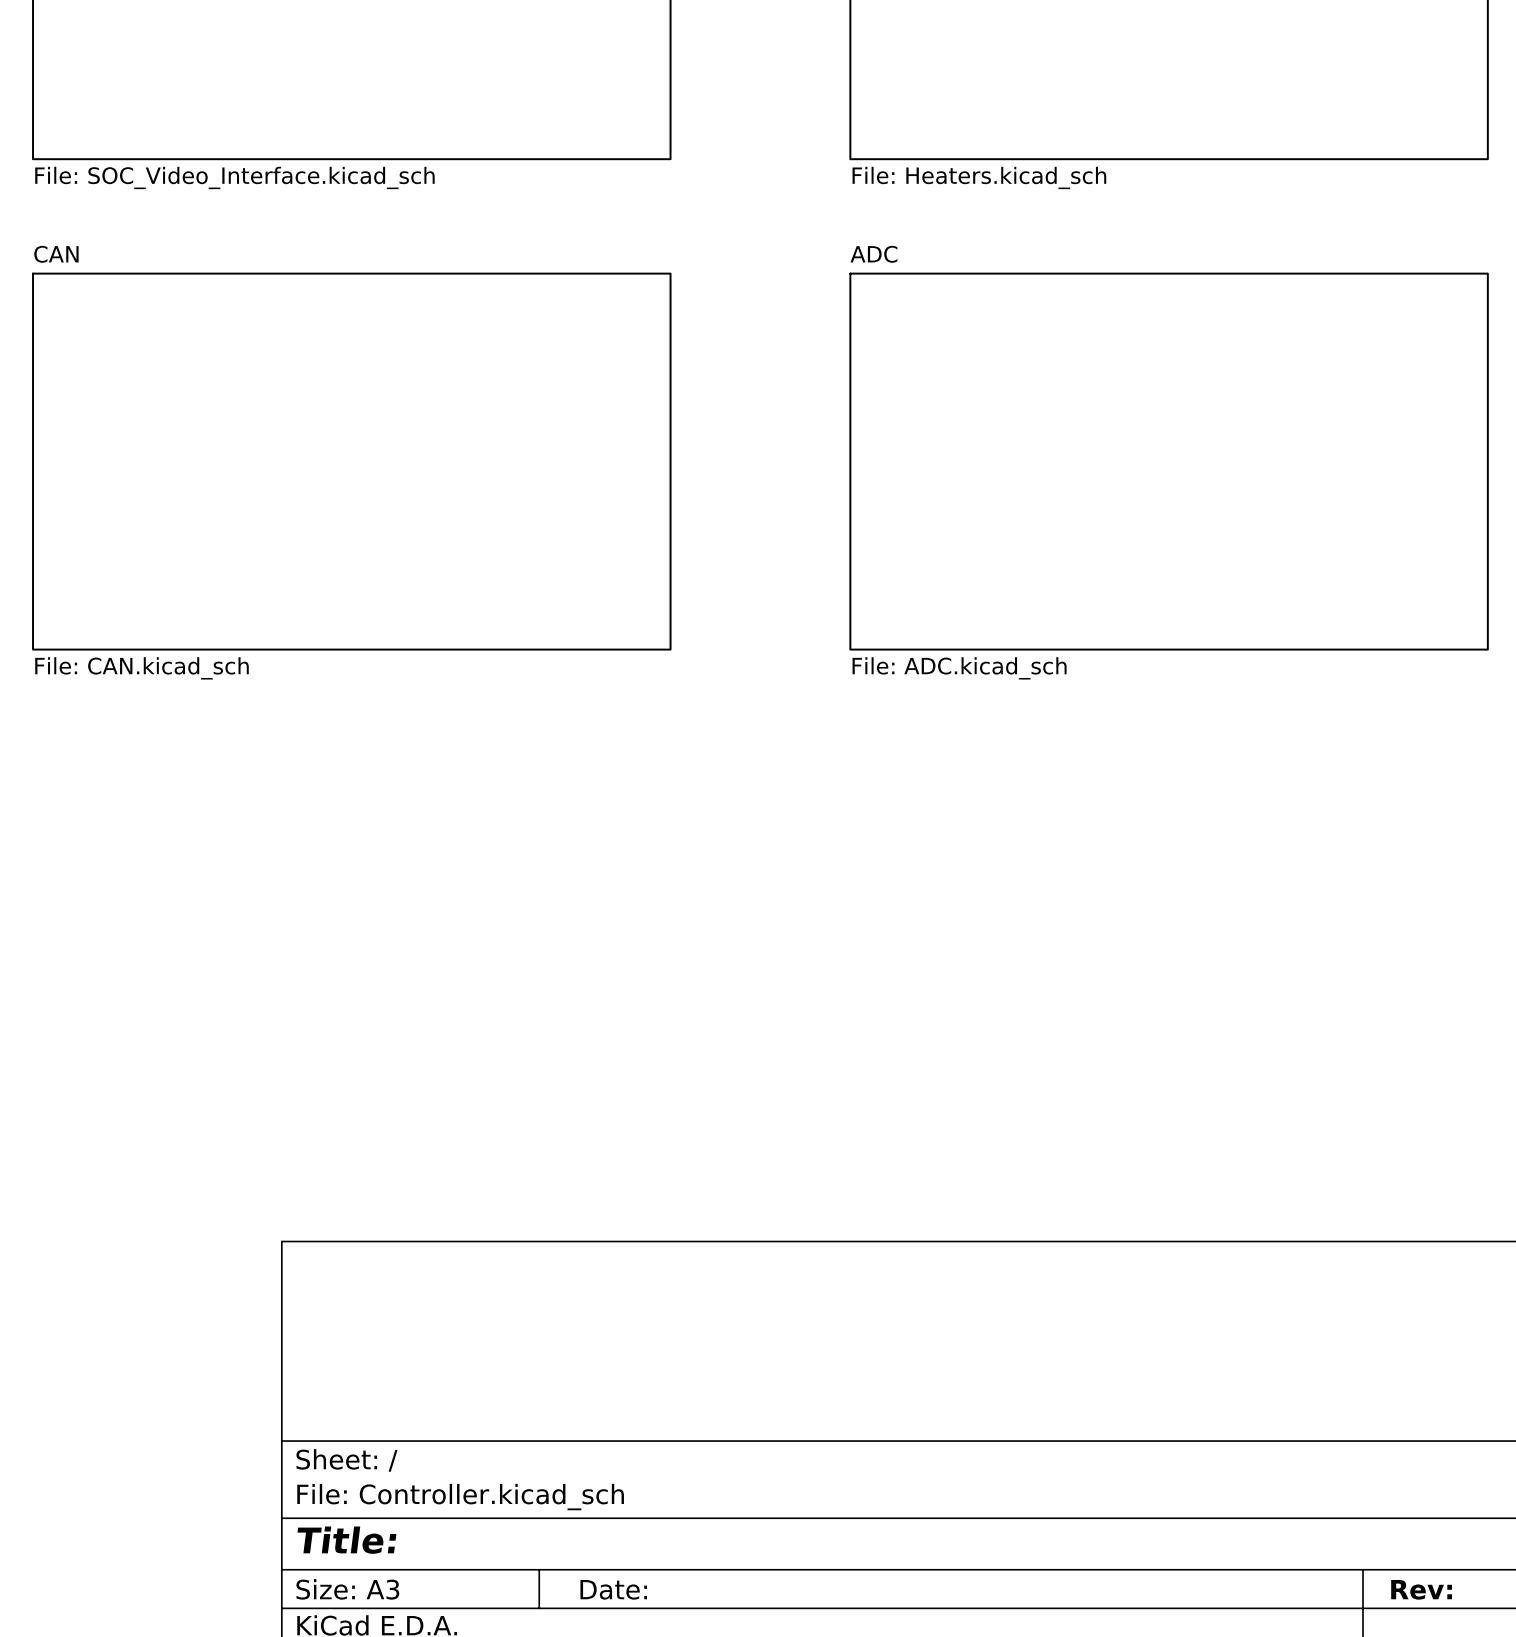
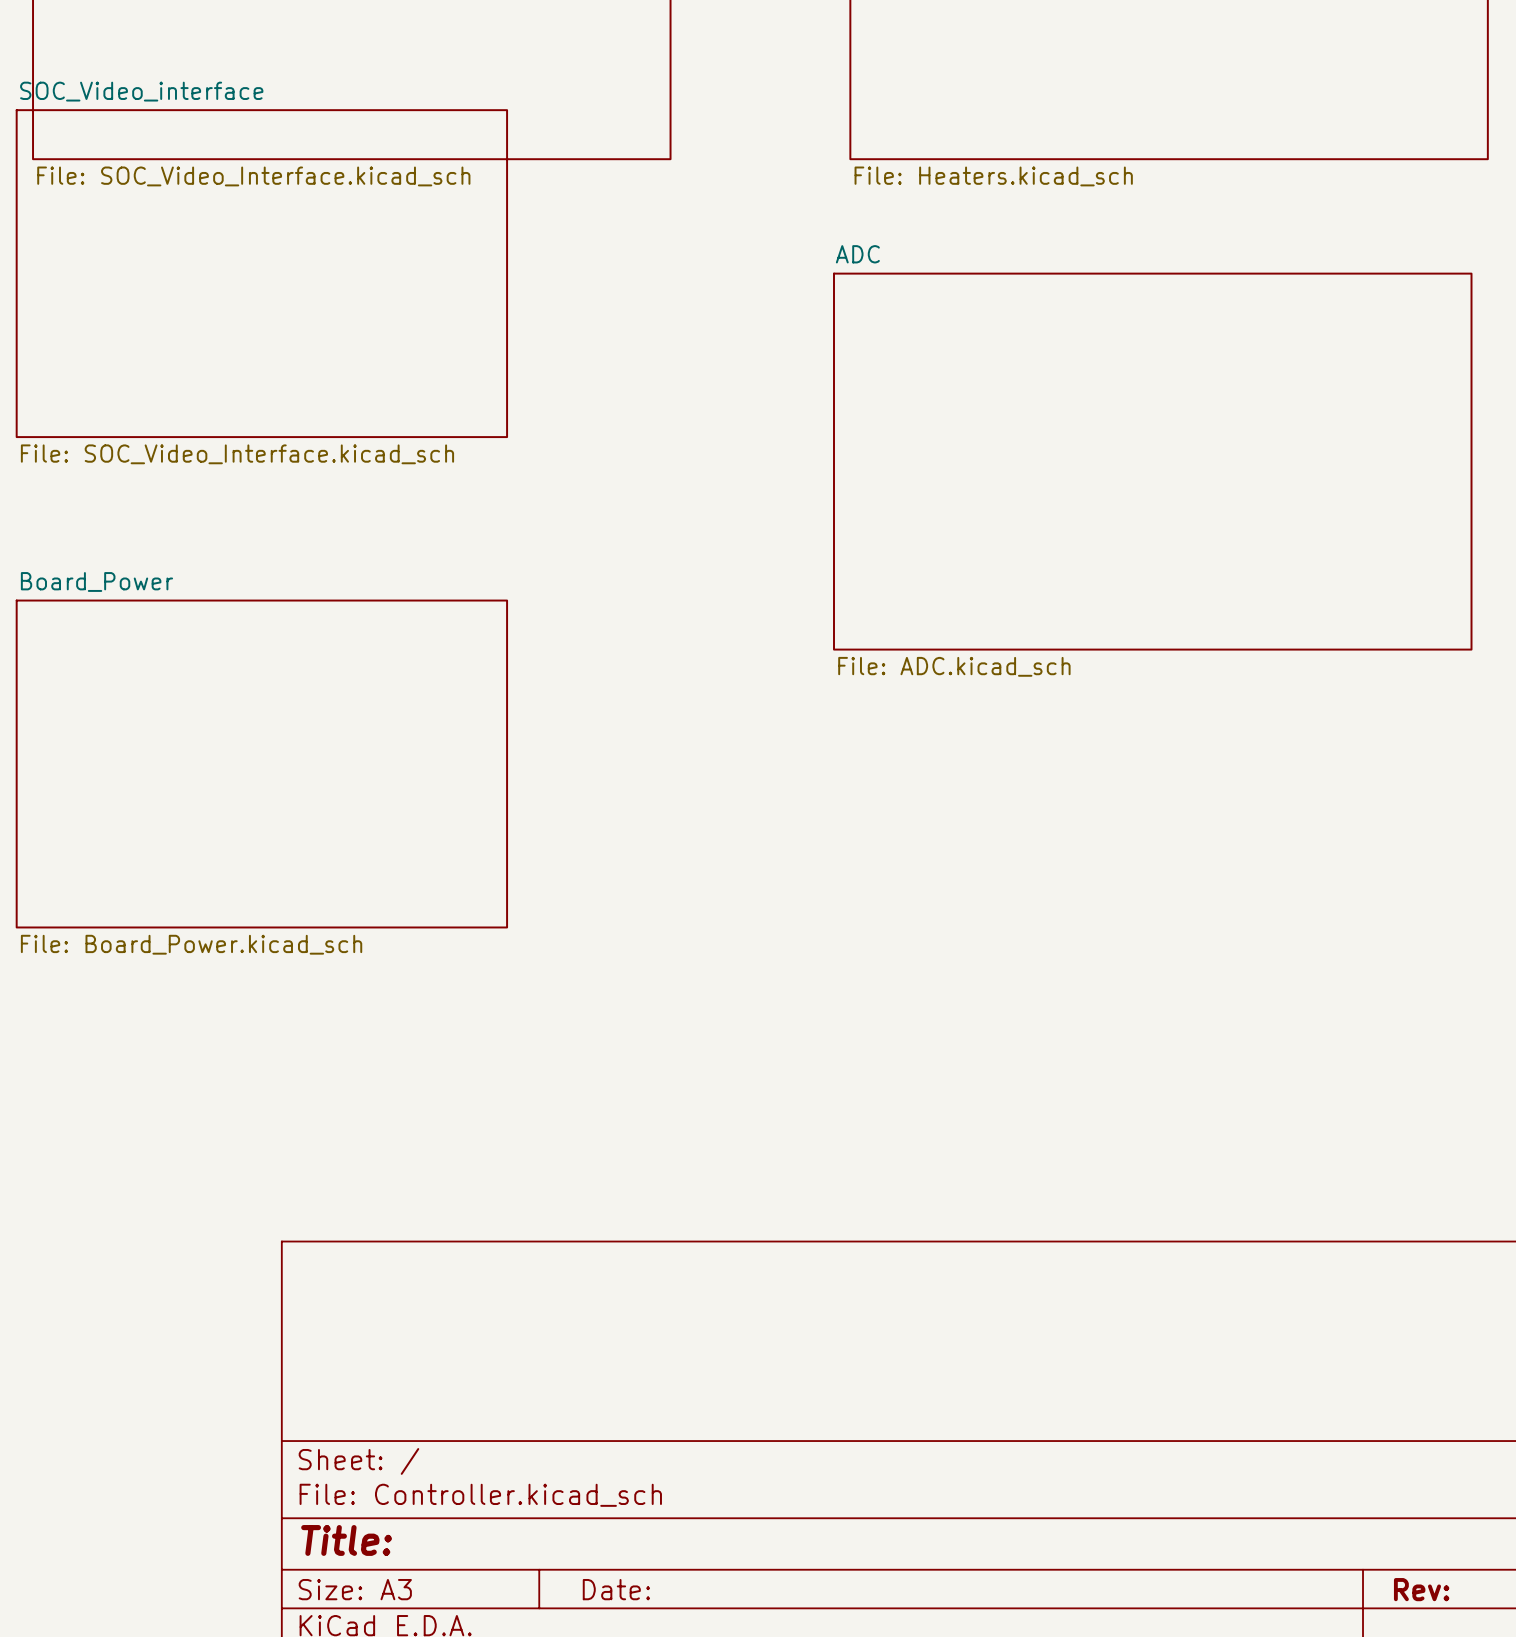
sheet SOC_Video_interface: none -> File: SOC_Video_Interface.kicad_sch (261, 273)
sheet CAN: File: CAN.kicad_sch (351, 461) -> none
sheet ADC position: (1169, 461) -> (1152, 461)
sheet Board_Power: none -> File: Board_Power.kicad_sch (261, 764)

